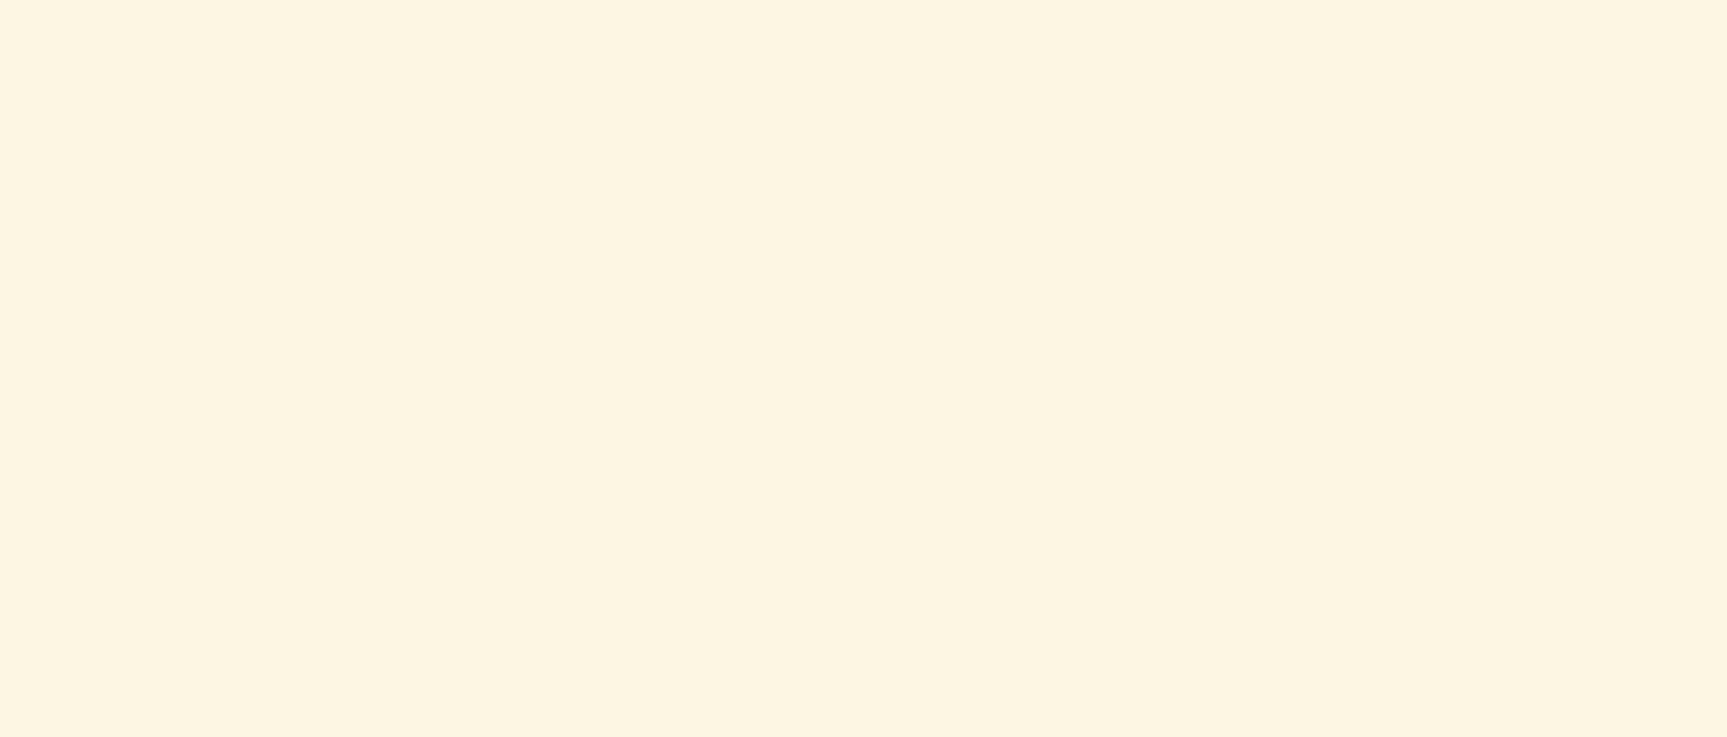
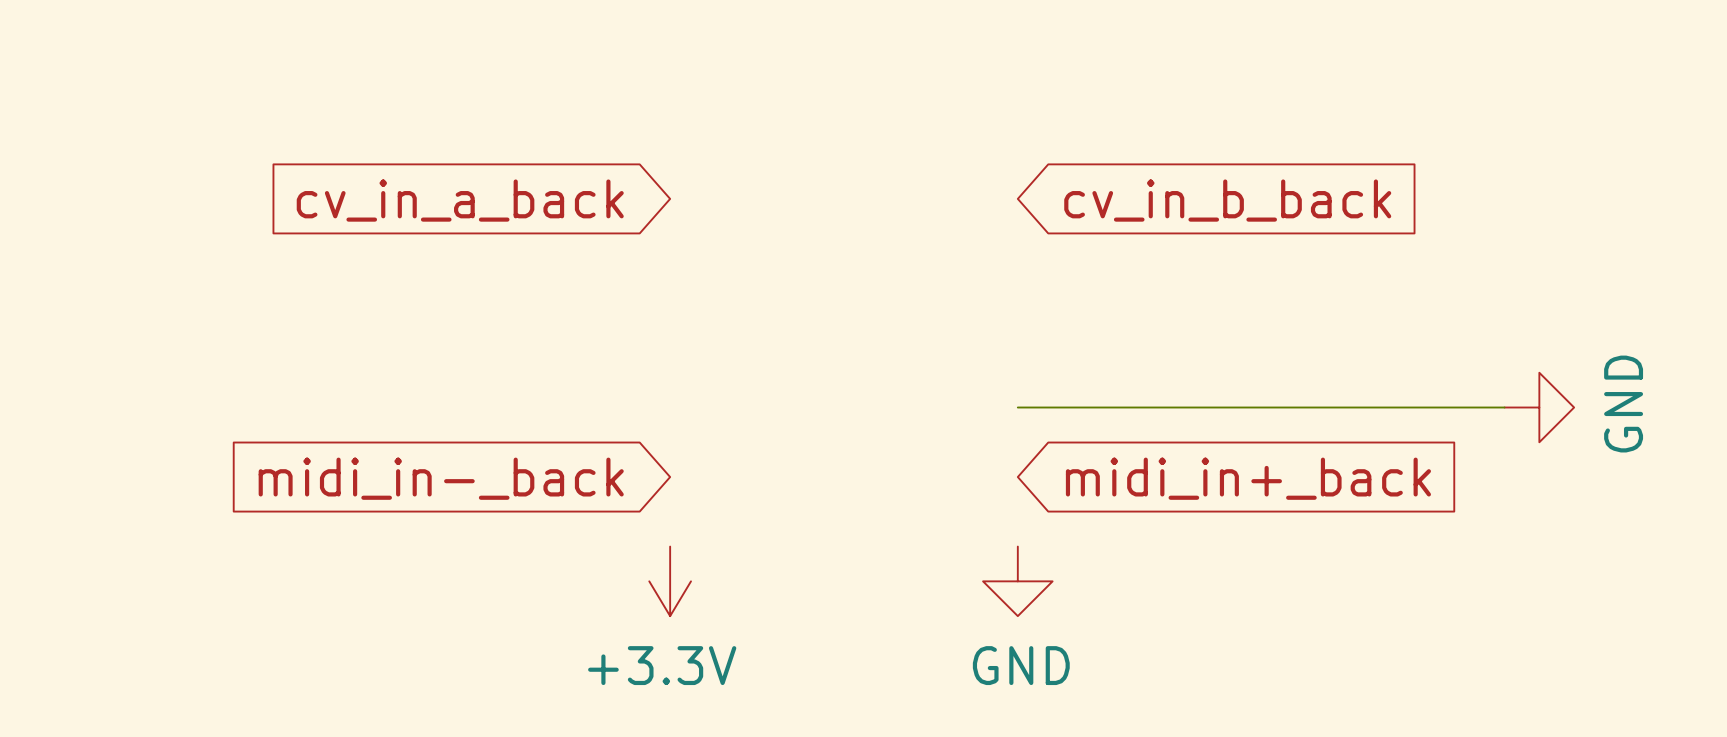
global label: none -> cv_in_a_back (460, 200)
global label: none -> cv_in_b_back (1227, 200)
wire: none -> (1017, 407) (1504, 407)
power symbol: none -> GND (1539, 407)
global label: none -> midi_in-_back (441, 478)
global label: none -> midi_in+_back (1248, 478)
power symbol: none -> +3.3V (670, 581)
power symbol: none -> GND (1017, 581)

